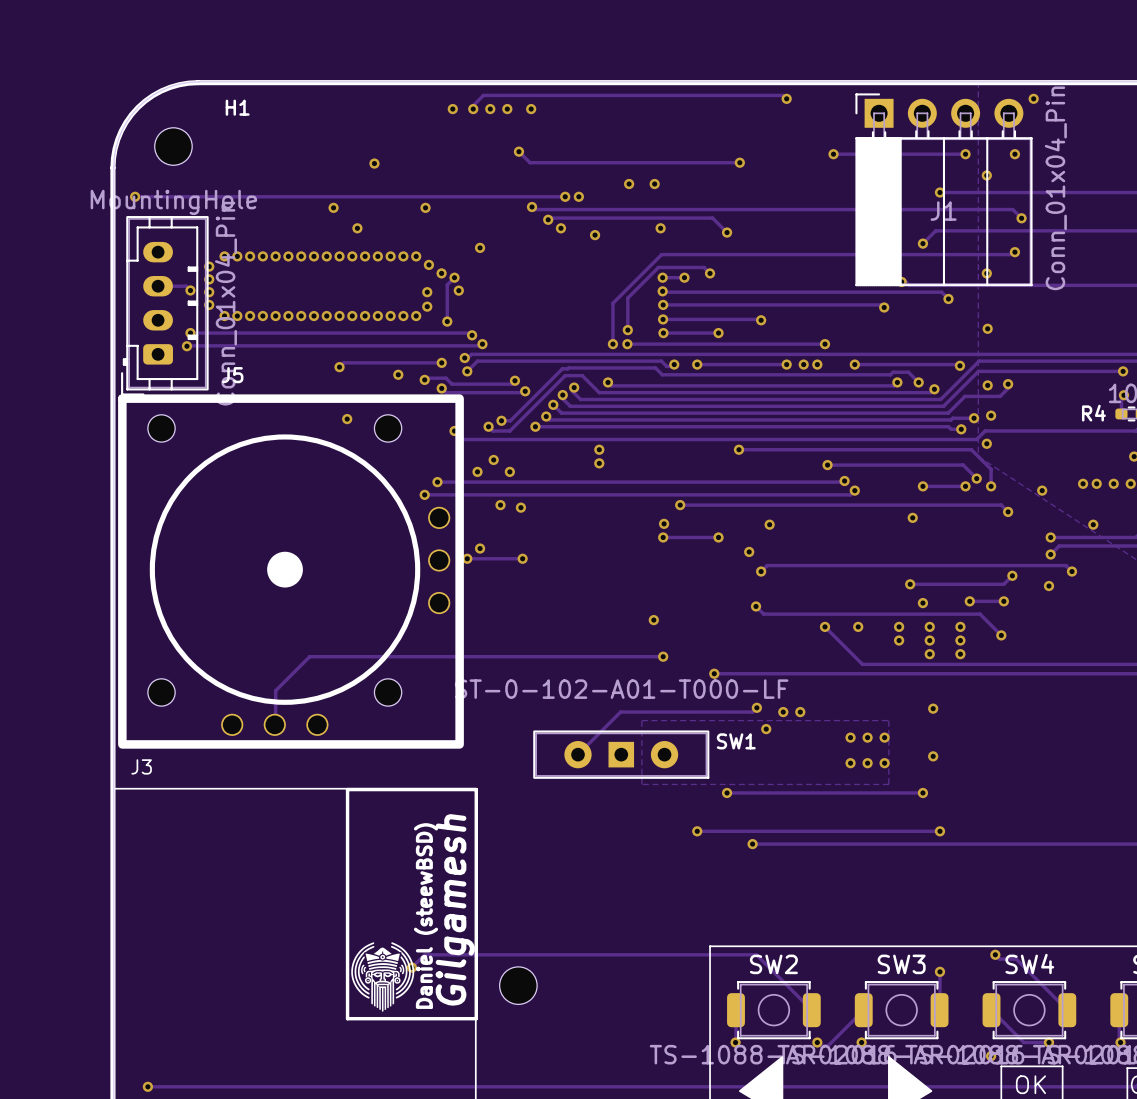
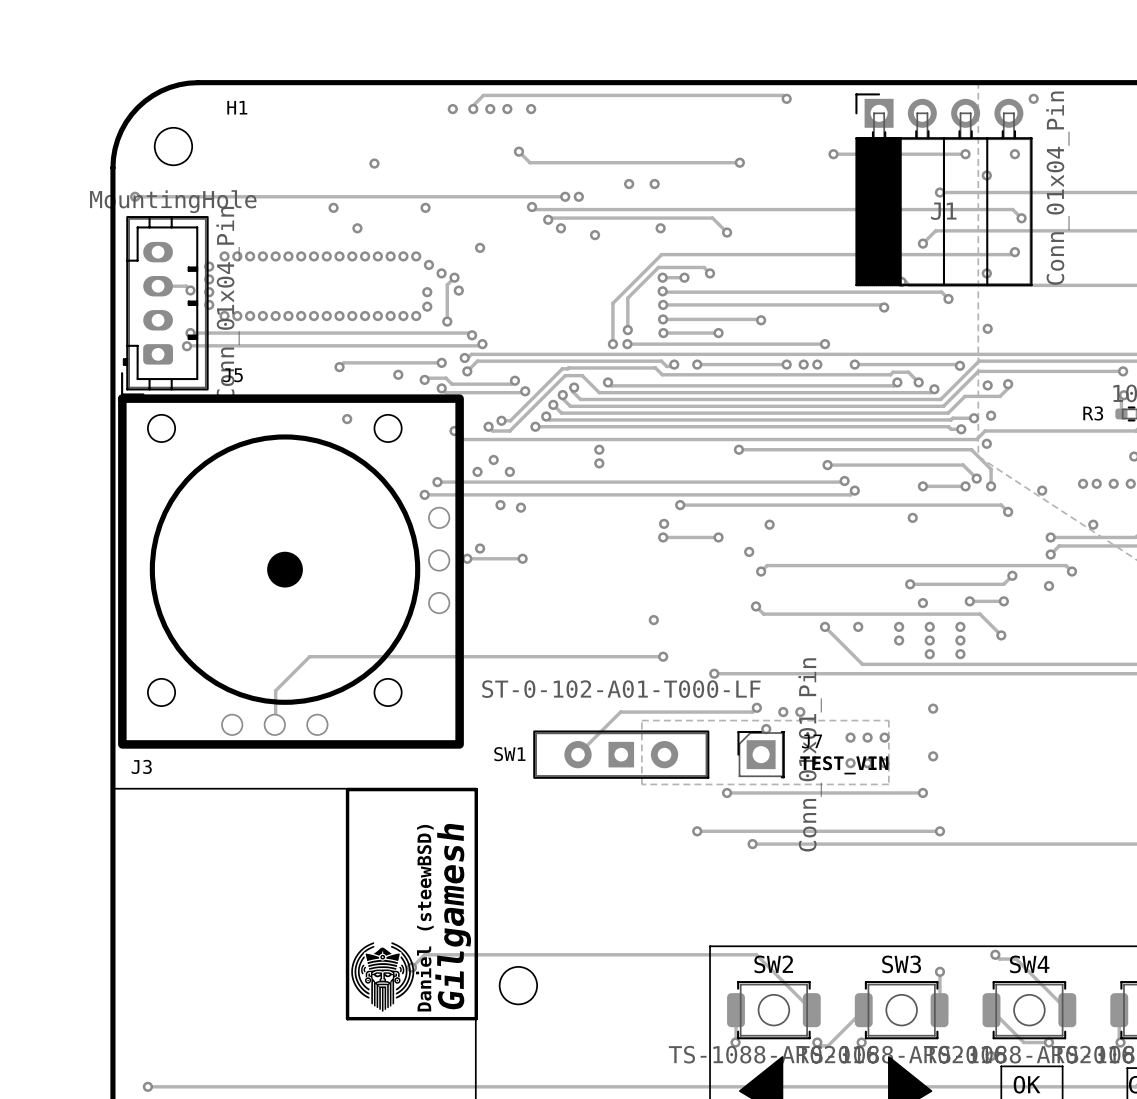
R4 name: R4 (1093, 413) -> R3 (1093, 413)
SW1 name position: SW1 (736, 741) -> SW1 (509, 754)
J7: none -> Conn_01x01_Pin (761, 754)
text: none -> TEST_VIN (844, 765)

